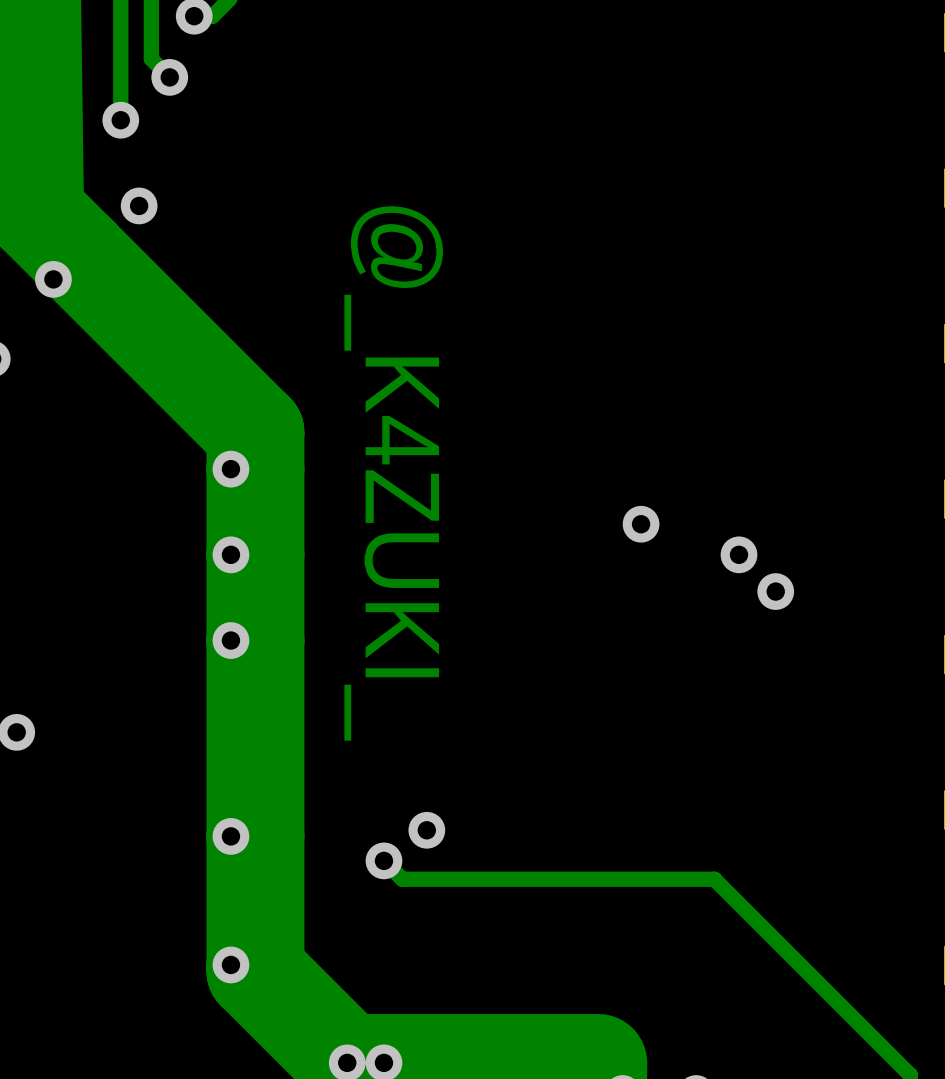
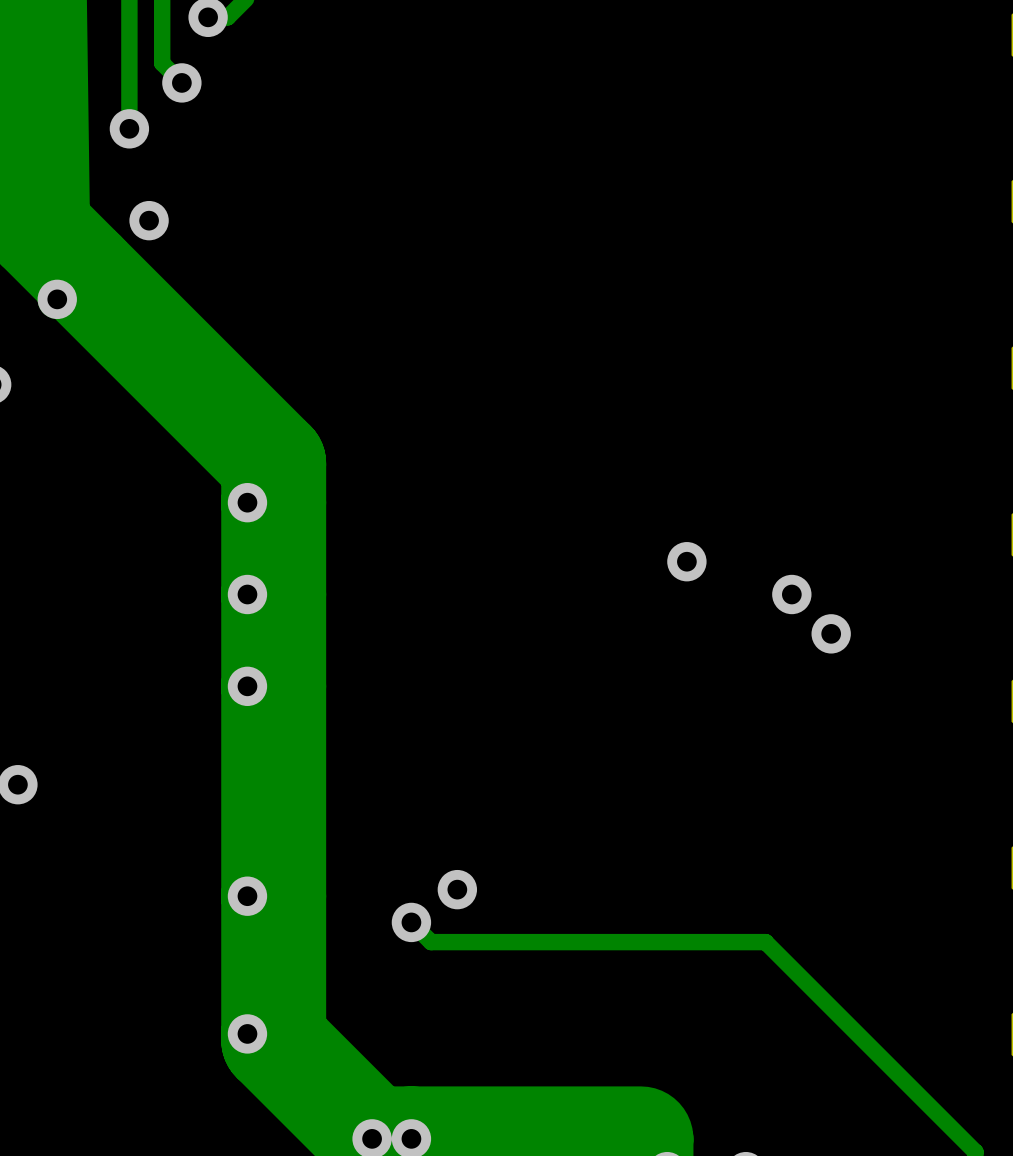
text: @_K4ZUKI_ (393, 473) -> none

